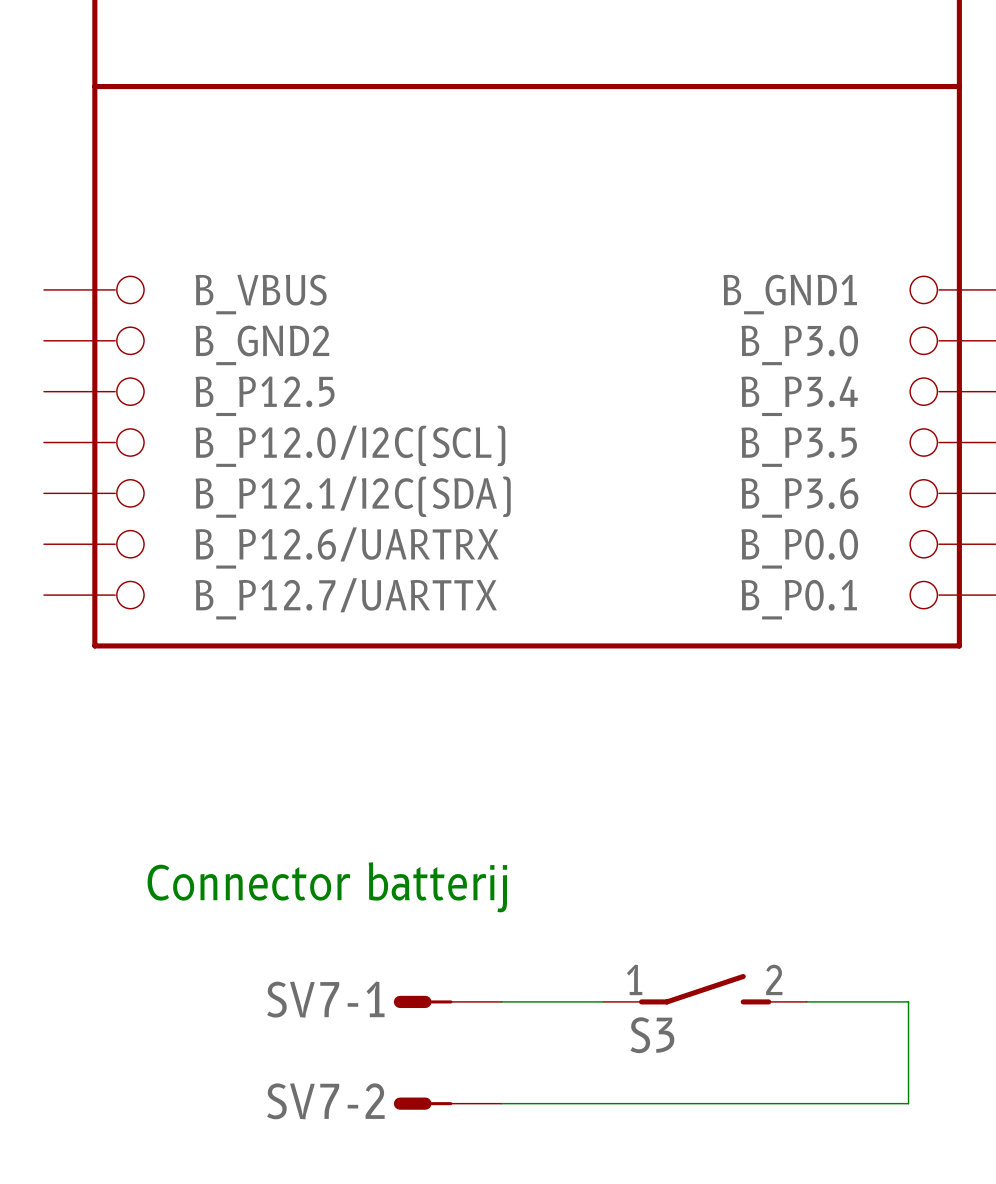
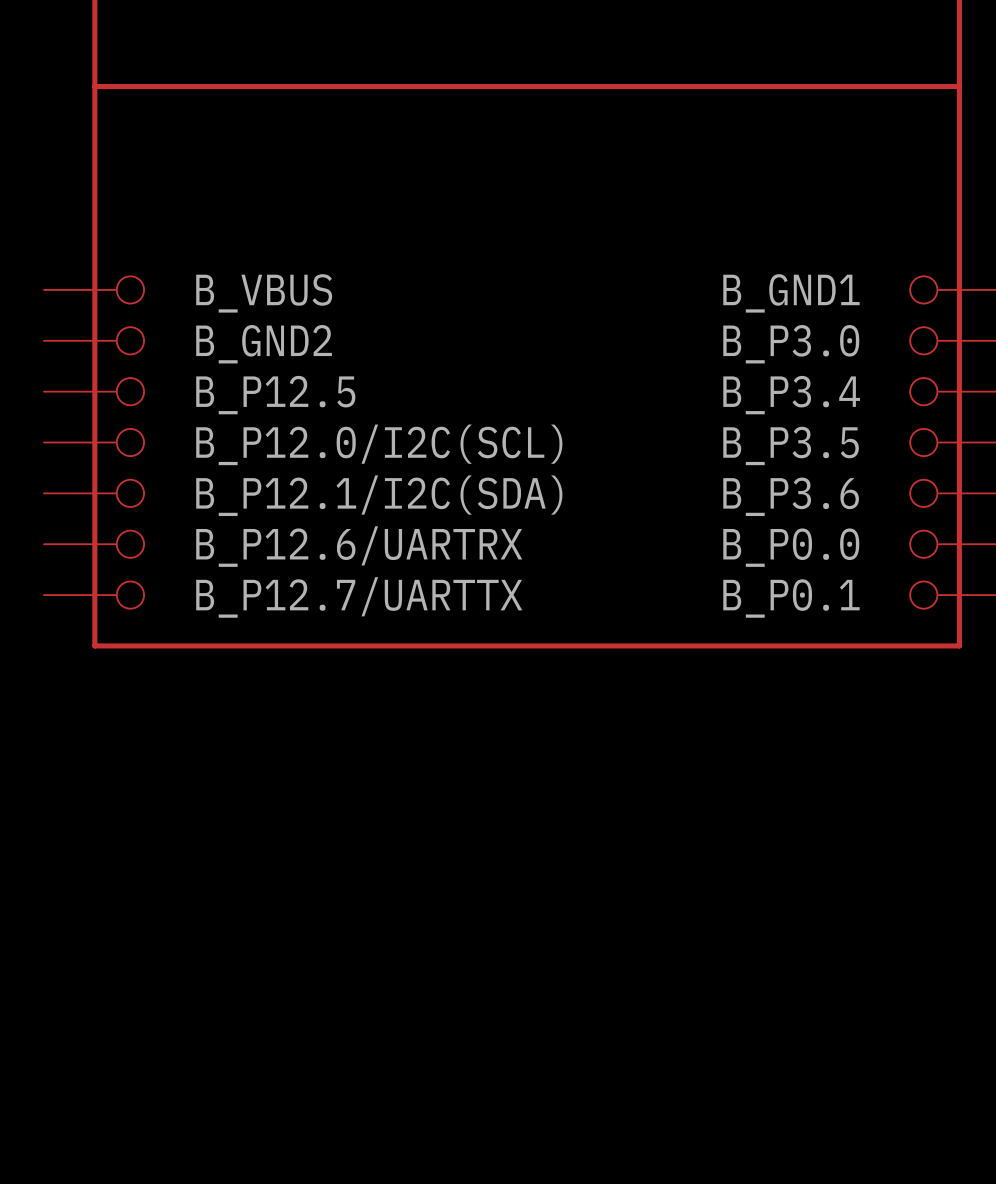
text: Connector batterij (327, 887) -> none
S3: (705, 989) -> none
SV7-1: (447, 1001) -> none
wire: (501, 1001) (603, 1001) -> none
wire: (806, 1001) (908, 1001) (908, 1103) (501, 1103) -> none
SV7-2: (447, 1103) -> none

